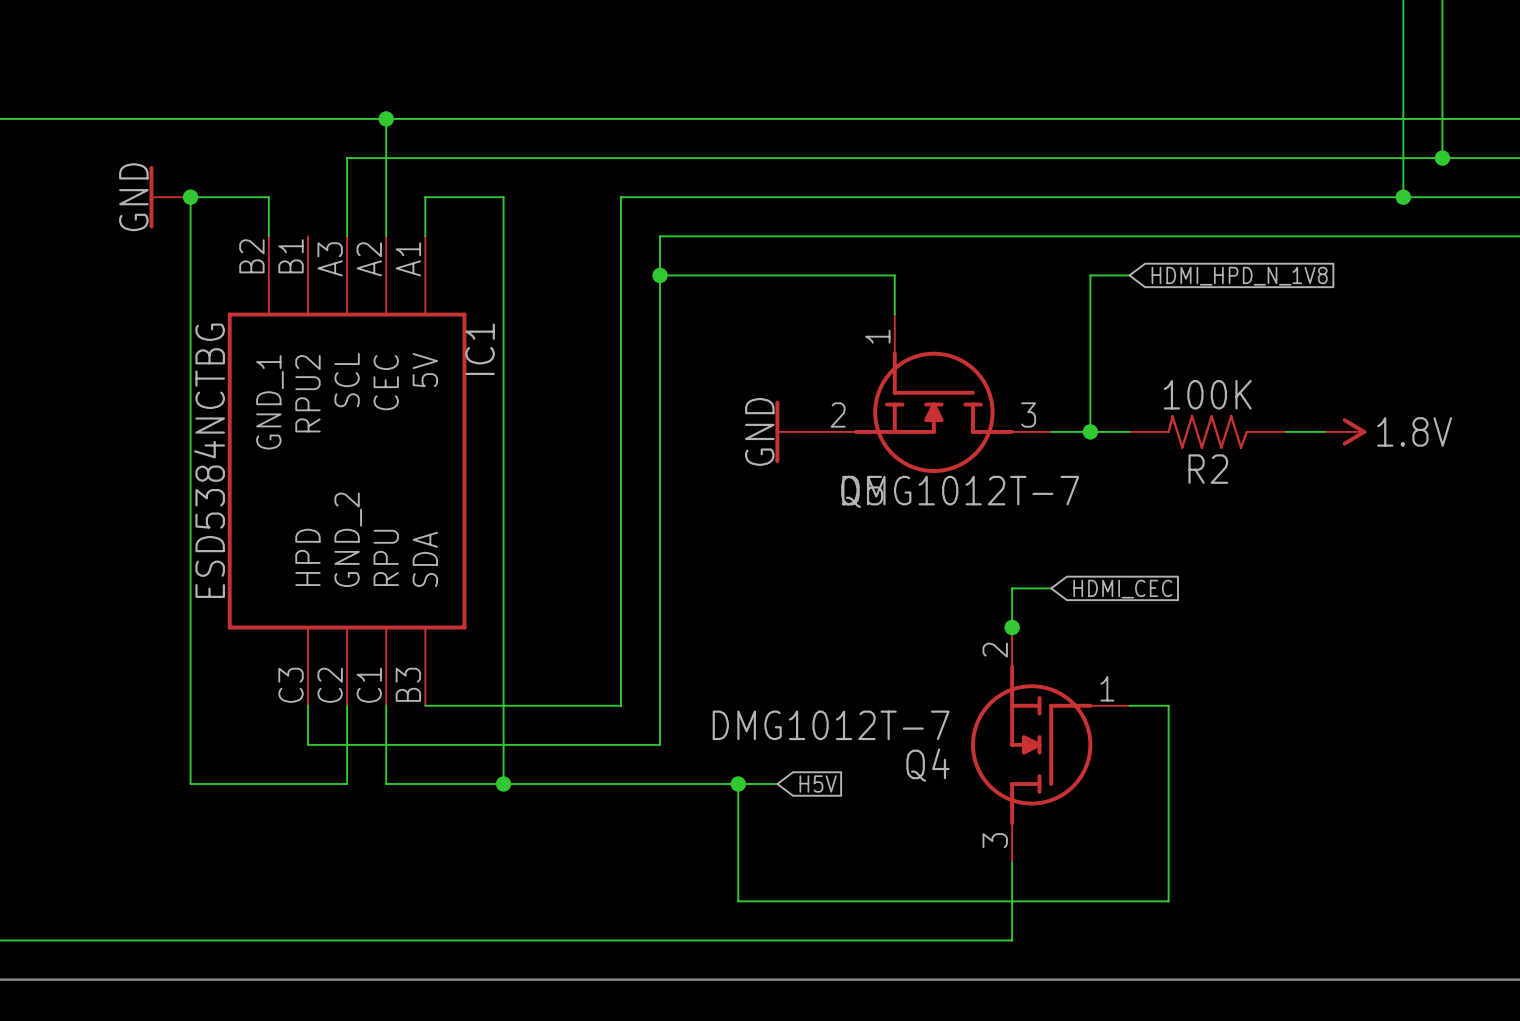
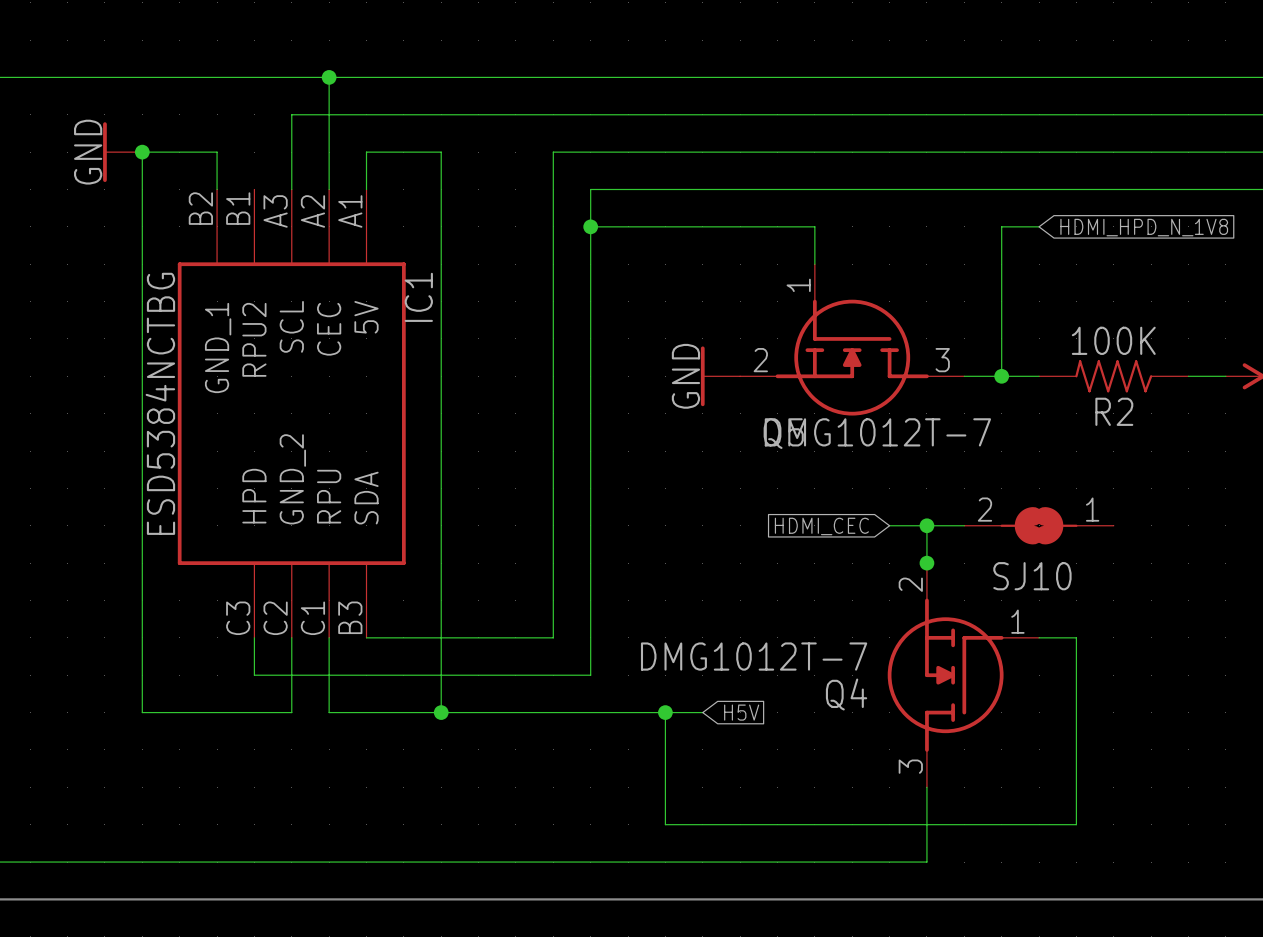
wire: none -> (889, 525) (926, 525)
junction: none -> (926, 525)
SJ10: none -> (1039, 525)
global label rotation: 0° (1122, 589) -> 180° (821, 526)
global label position: HDMI_CEC (1122, 589) -> HDMI_CEC (821, 526)

